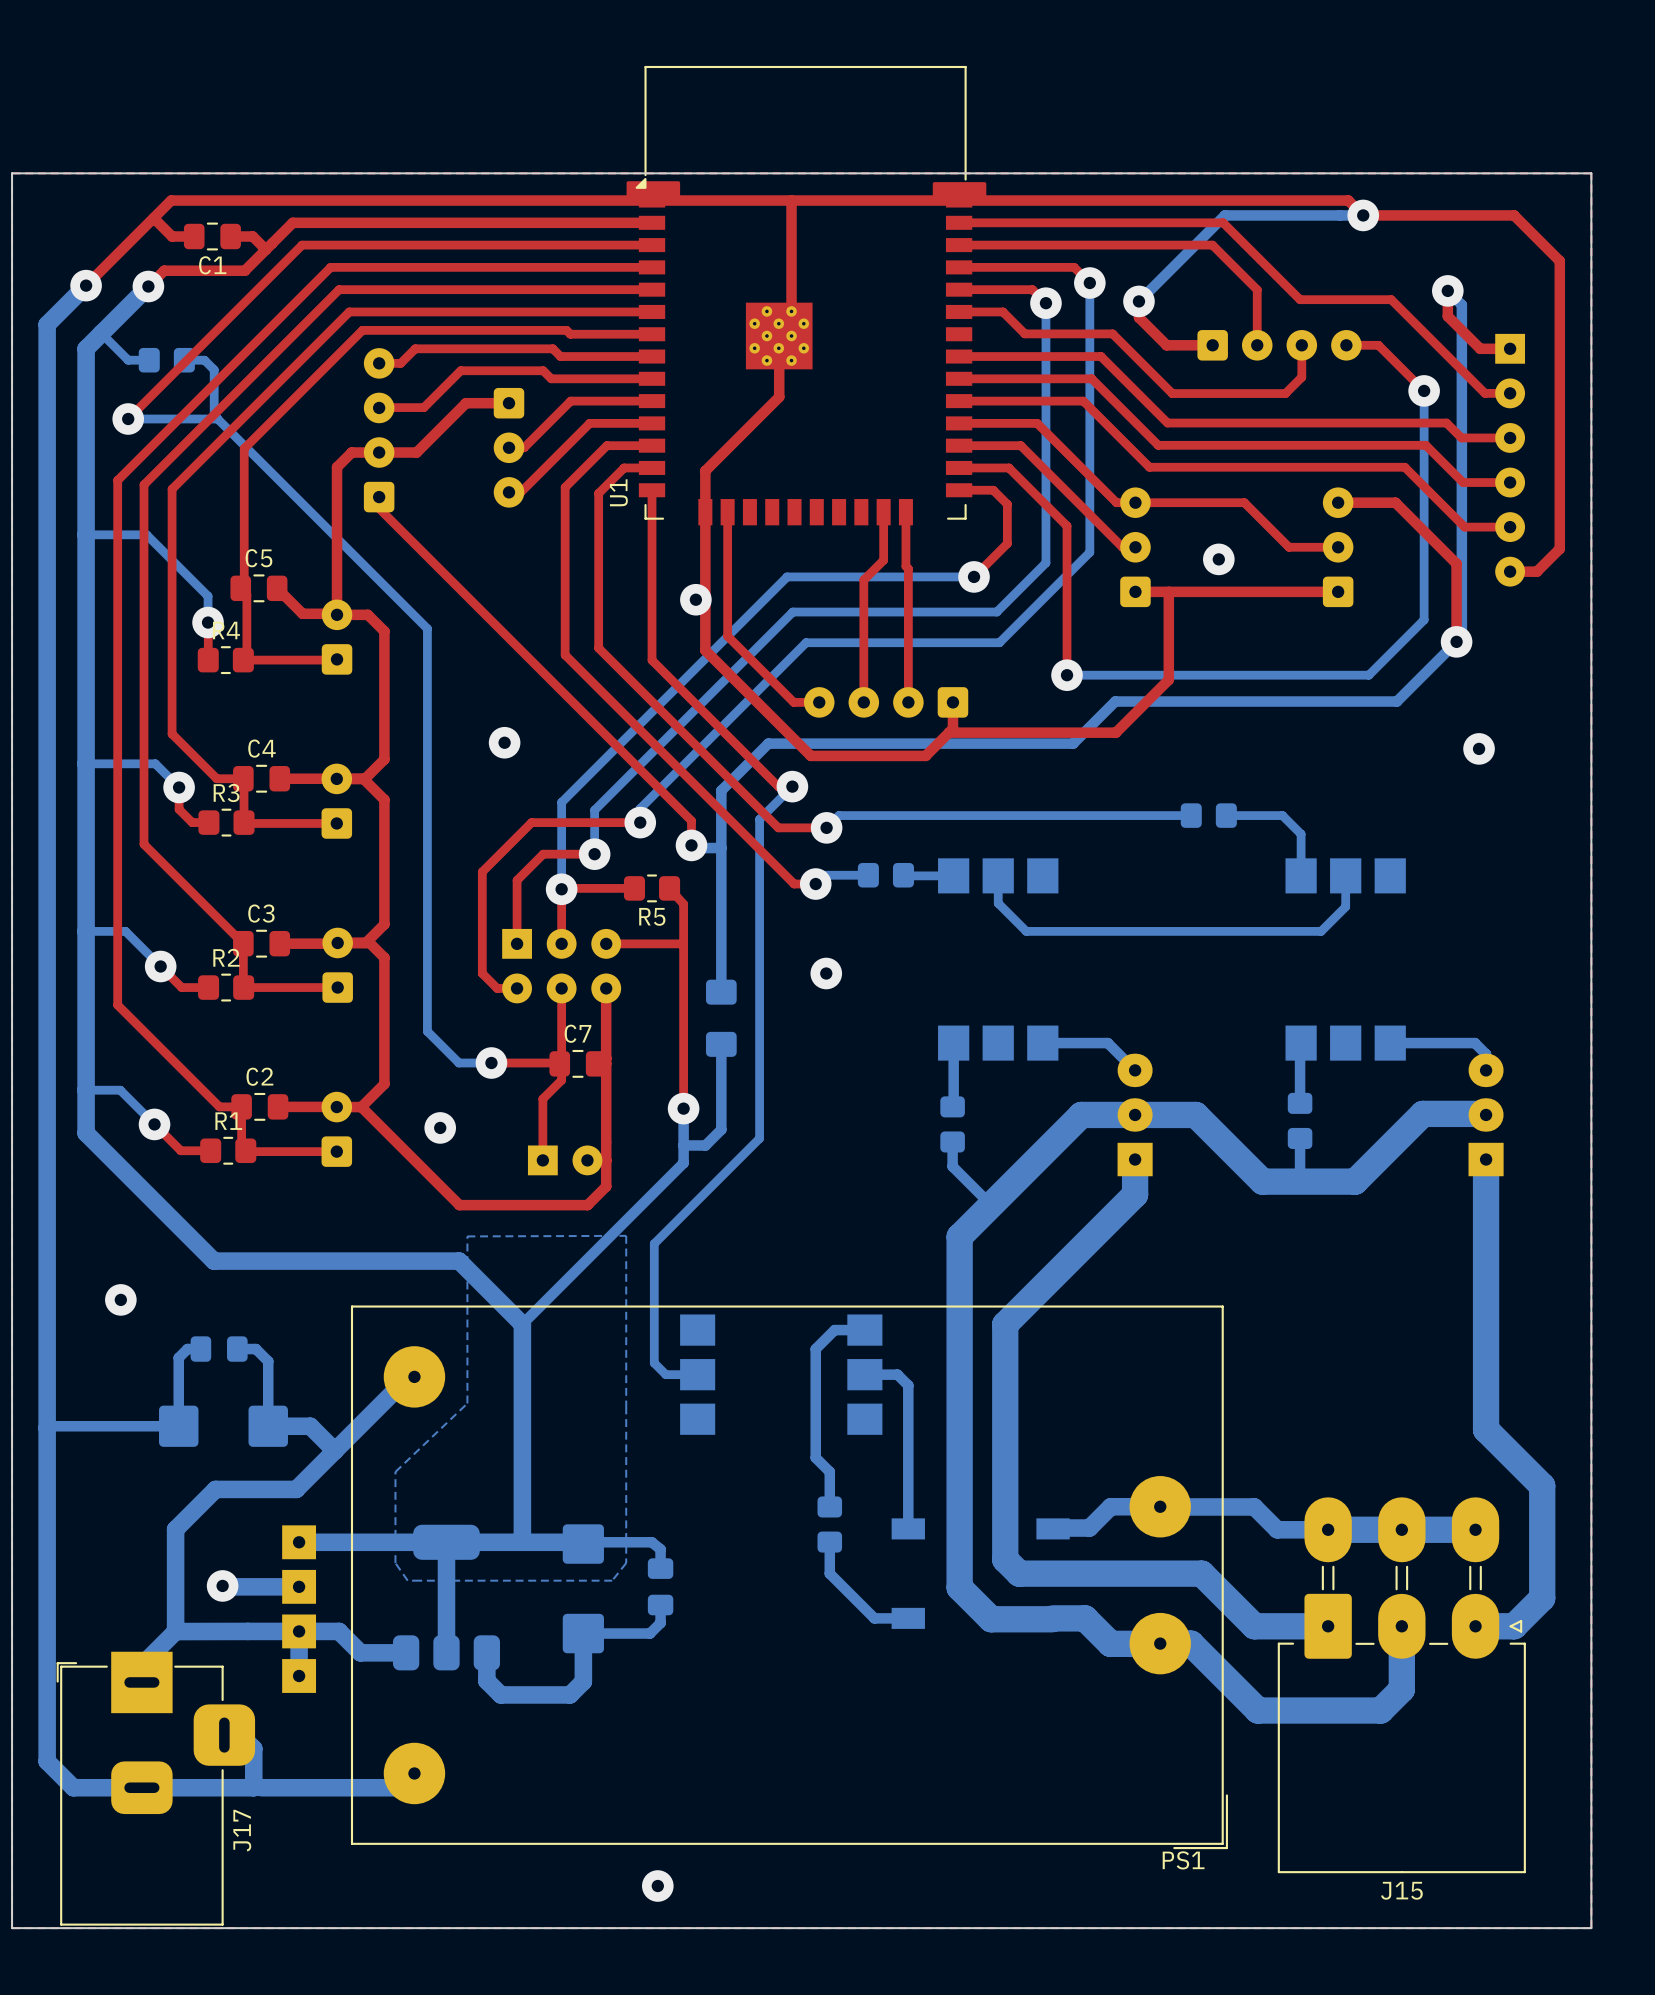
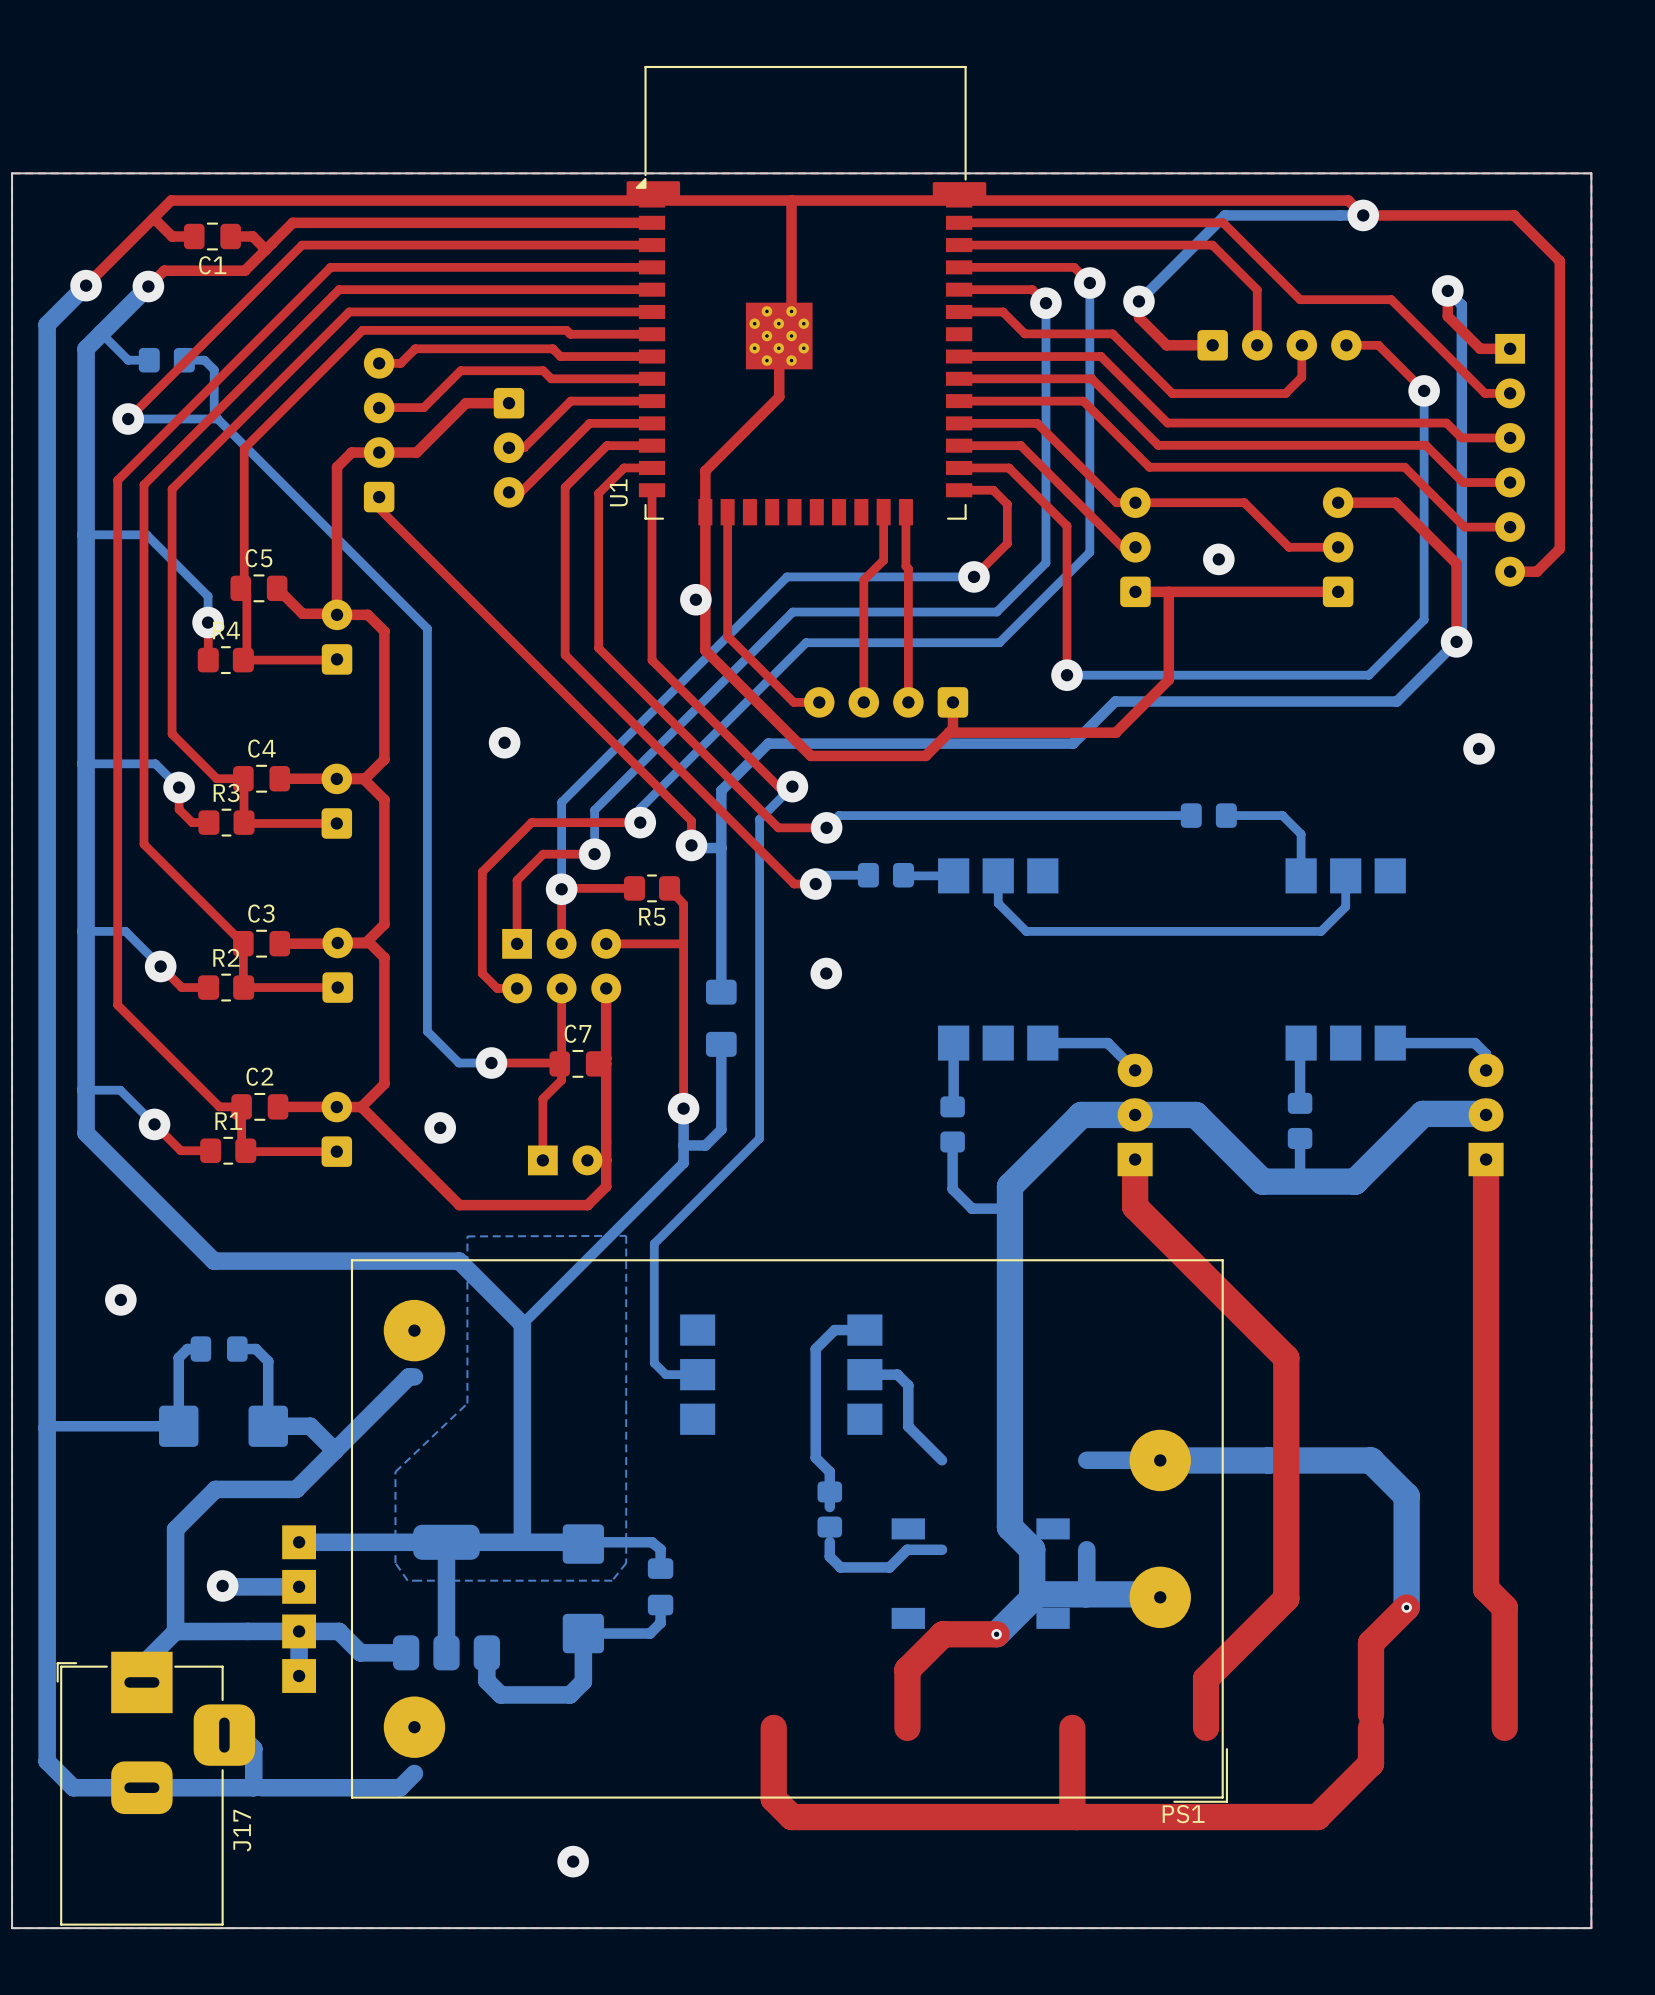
top track: none -> (1135, 1159) (1135, 1206) (1286, 1357) (1286, 1598) (1206, 1678) (1206, 1727)
bottom track: (1135, 1159) (1135, 1194) (1005, 1324) (1005, 1559) (1019, 1573) (1201, 1573) (1254, 1626) (1328, 1626) -> none
top track: none -> (1486, 1159) (1486, 1588) (1504, 1607) (1504, 1727)
bottom track: (1486, 1159) (1486, 1429) (1542, 1485) (1542, 1598) (1514, 1626) (1475, 1626) -> none
bottom track: (952, 1166) (994, 1208) -> (952, 1166) (952, 1189) (972, 1208) (1009, 1208)
bottom track: (1009, 1186) (959, 1236) (959, 1587) (991, 1619) (1052, 1619) -> (1009, 1186) (1009, 1527) (1032, 1549) (1032, 1598)
bottom track: (908, 1426) (908, 1528) -> (908, 1426) (942, 1460)
bottom track: none -> (1086, 1460) (1156, 1460)
bottom track: none -> (1157, 1460) (1370, 1460) (1406, 1496) (1406, 1607)
bottom track: (1160, 1506) (1110, 1506) (1089, 1528) (1053, 1528) -> none
bottom track: (1160, 1506) (1254, 1506) (1277, 1529) (1475, 1529) -> none
part position: (829, 1524) -> (829, 1509)
bottom track: none -> (1086, 1549) (1085, 1594)
bottom track: (829, 1556) (829, 1573) (874, 1618) (908, 1618) -> (829, 1556) (840, 1567) (889, 1567) (907, 1549) (942, 1549)
PS1 position: (789, 1577) -> (789, 1531)
bottom track: none -> (1160, 1597) (1157, 1594) (1036, 1594) (996, 1634)
top track: none -> (1406, 1607) (1370, 1643) (1370, 1714)
via: none -> (1406, 1607)
bottom track: (1053, 1618) (1085, 1618) (1110, 1643) (1160, 1643) -> none
bottom track: (1401, 1626) (1401, 1689) (1380, 1710) (1257, 1710) (1191, 1643) (1160, 1643) -> none
top track: none -> (996, 1634) (943, 1634) (907, 1669) (907, 1727)
via: none -> (996, 1634)
J15: (1401, 1685) -> none
top track: none -> (773, 1727) (773, 1798) (791, 1817) (1317, 1817) (1370, 1763) (1370, 1727)
top track: none -> (1072, 1727) (1072, 1812) (1076, 1817)
via position: (657, 1886) -> (573, 1861)

